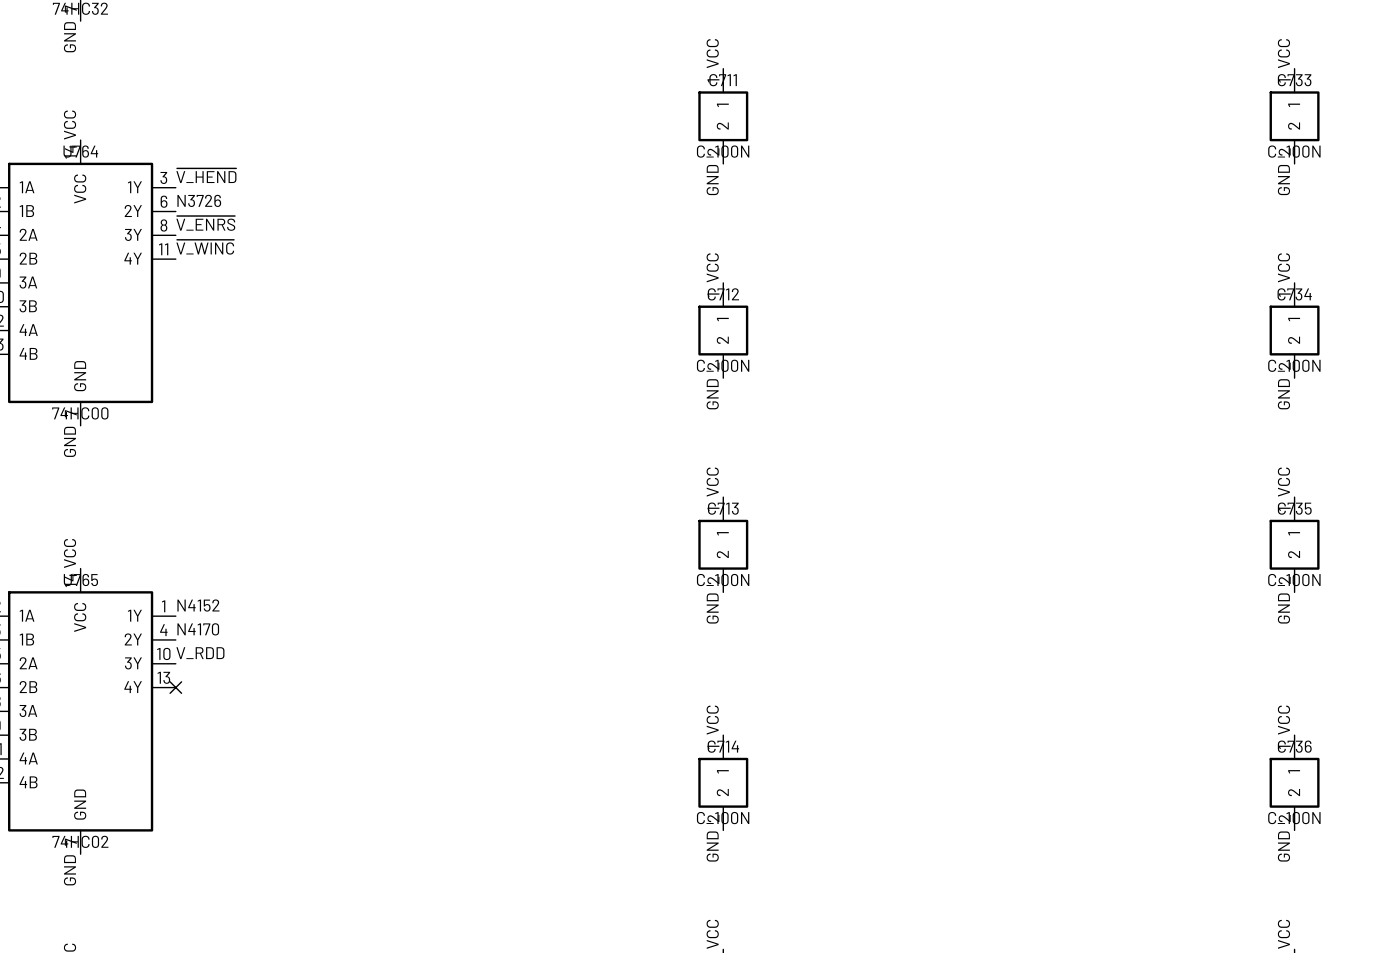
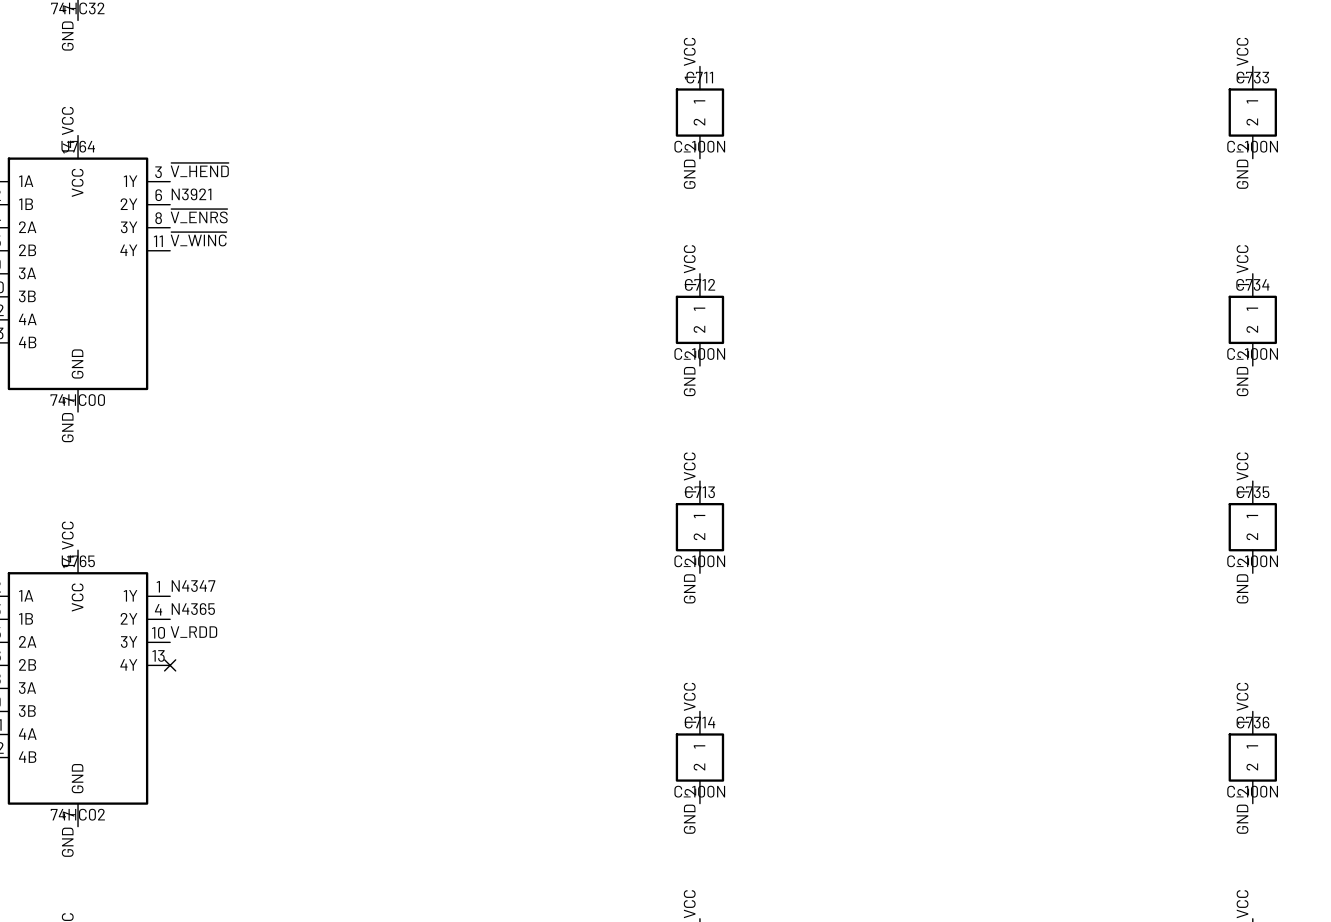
label: N3726 (199, 200) -> N3921 (191, 194)
label: N4152 (198, 605) -> N4347 (193, 586)
label: N4170 (198, 629) -> N4365 (193, 609)

